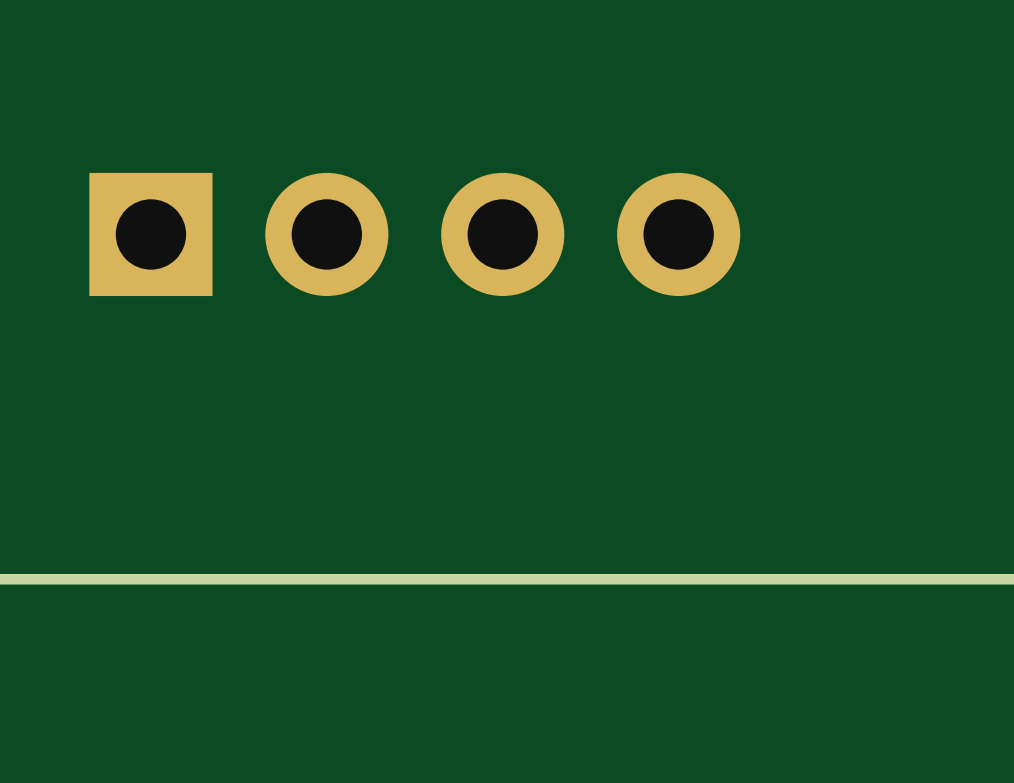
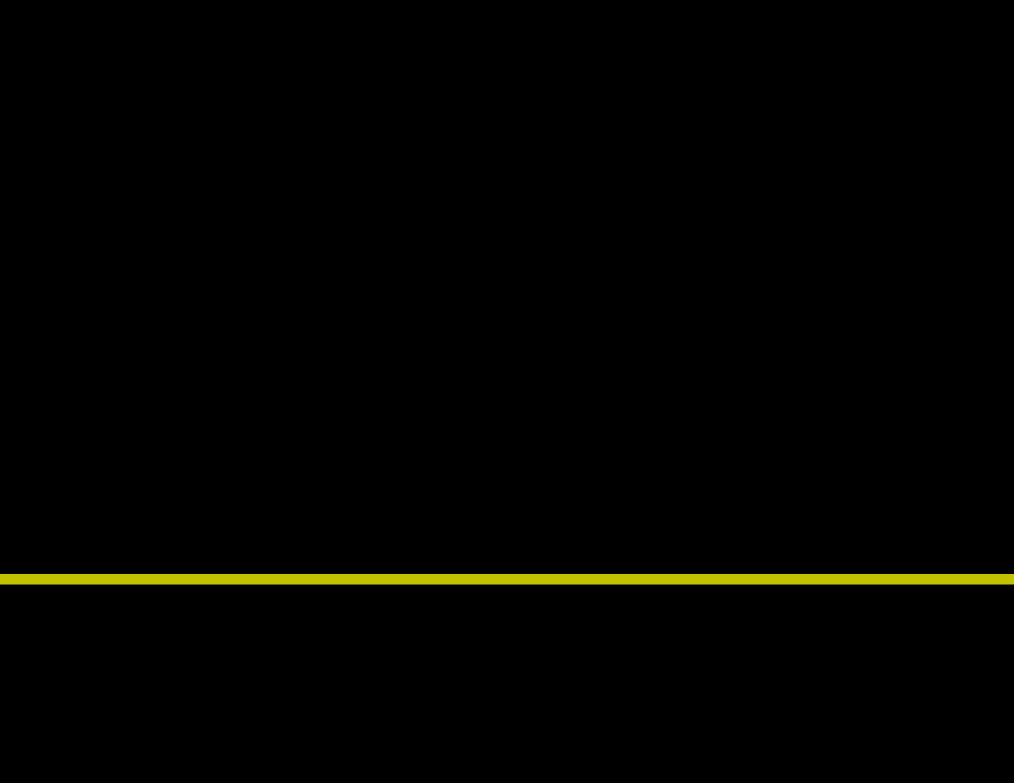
part: (414, 234) -> none

